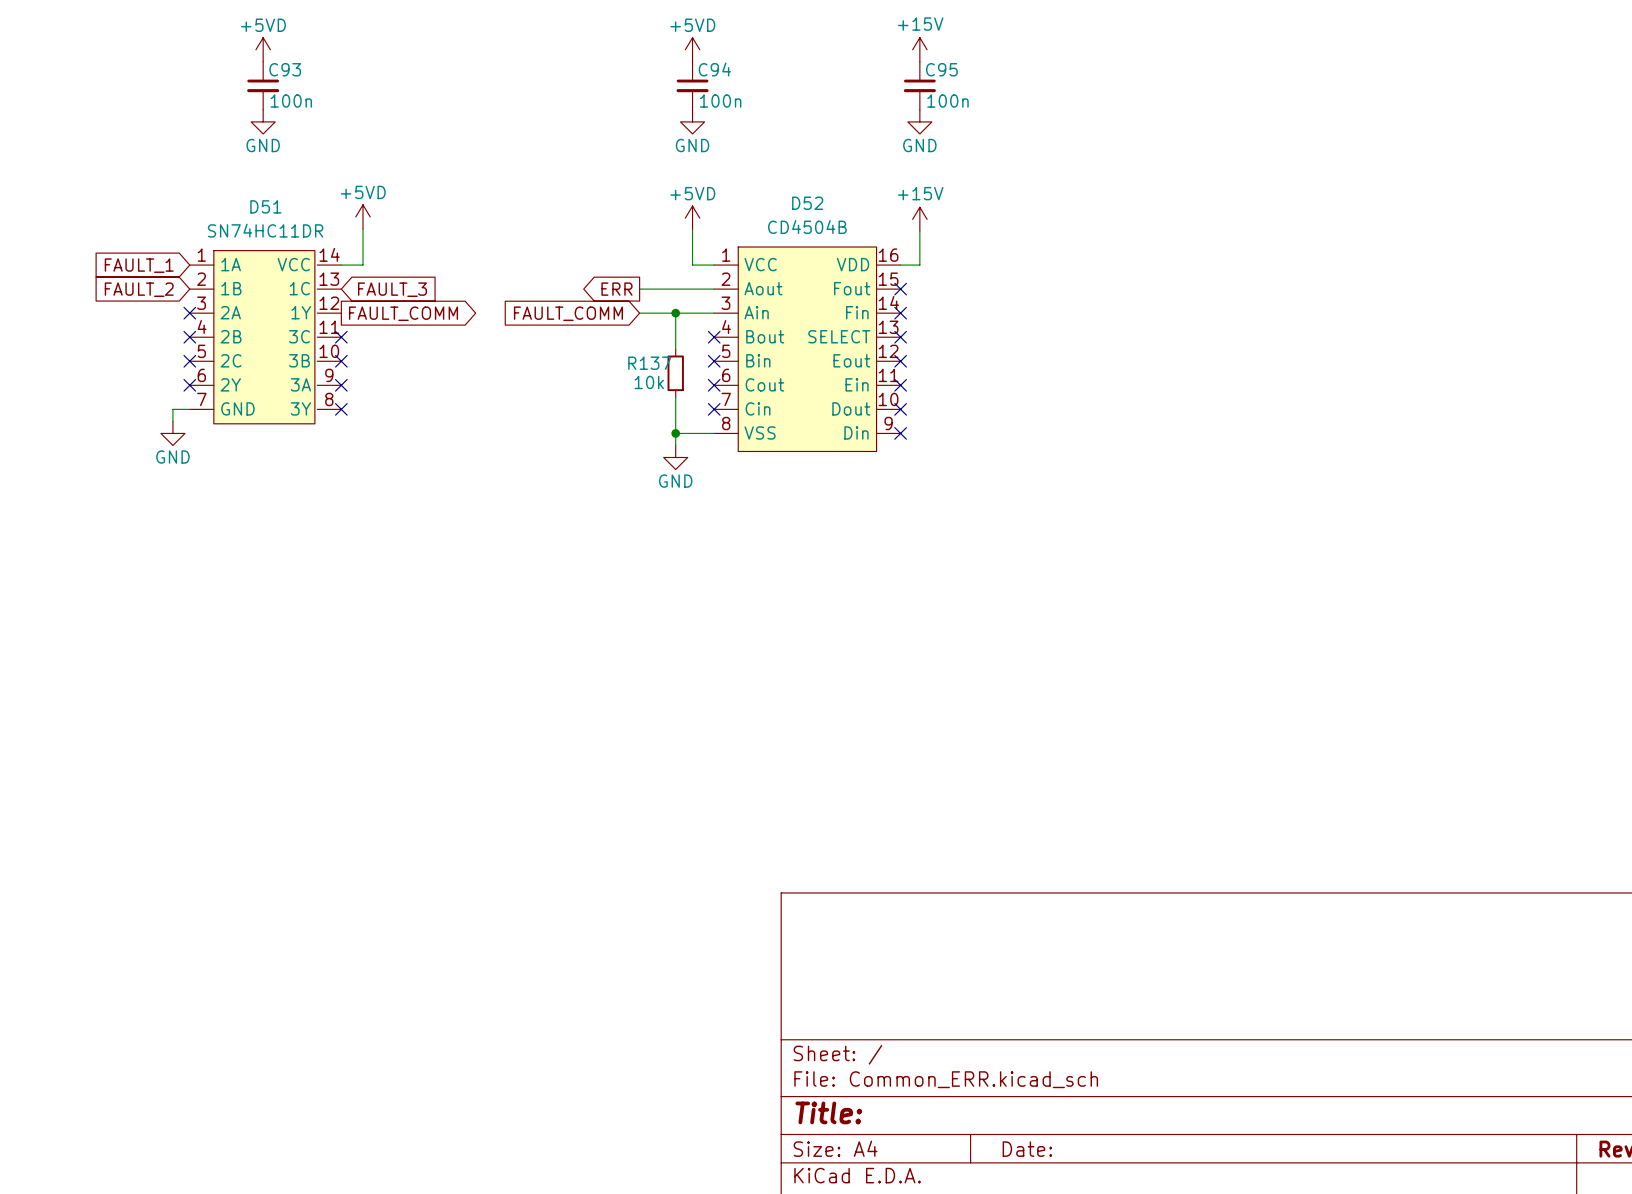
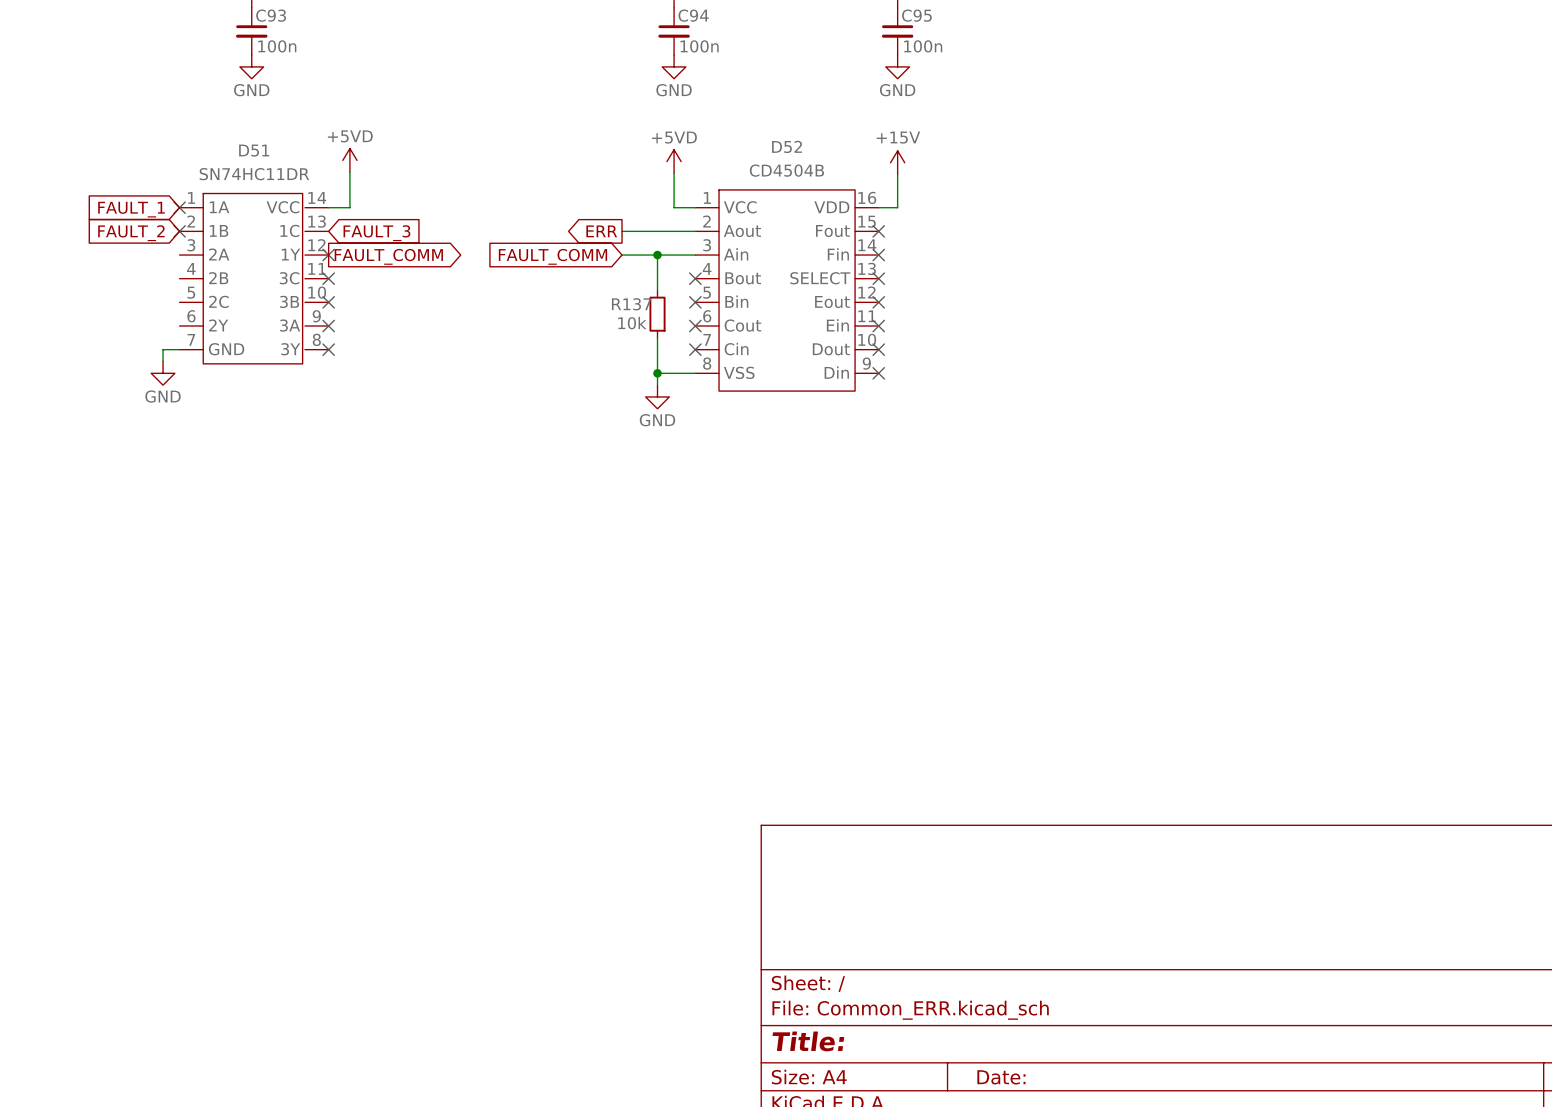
no-connect mark: none -> (179, 207)
no-connect mark: none -> (179, 231)
no-connect mark: (189, 313) -> none
no-connect mark: none -> (328, 255)
no-connect mark: (189, 337) -> none
no-connect mark: (189, 361) -> none
no-connect mark: (189, 385) -> none

